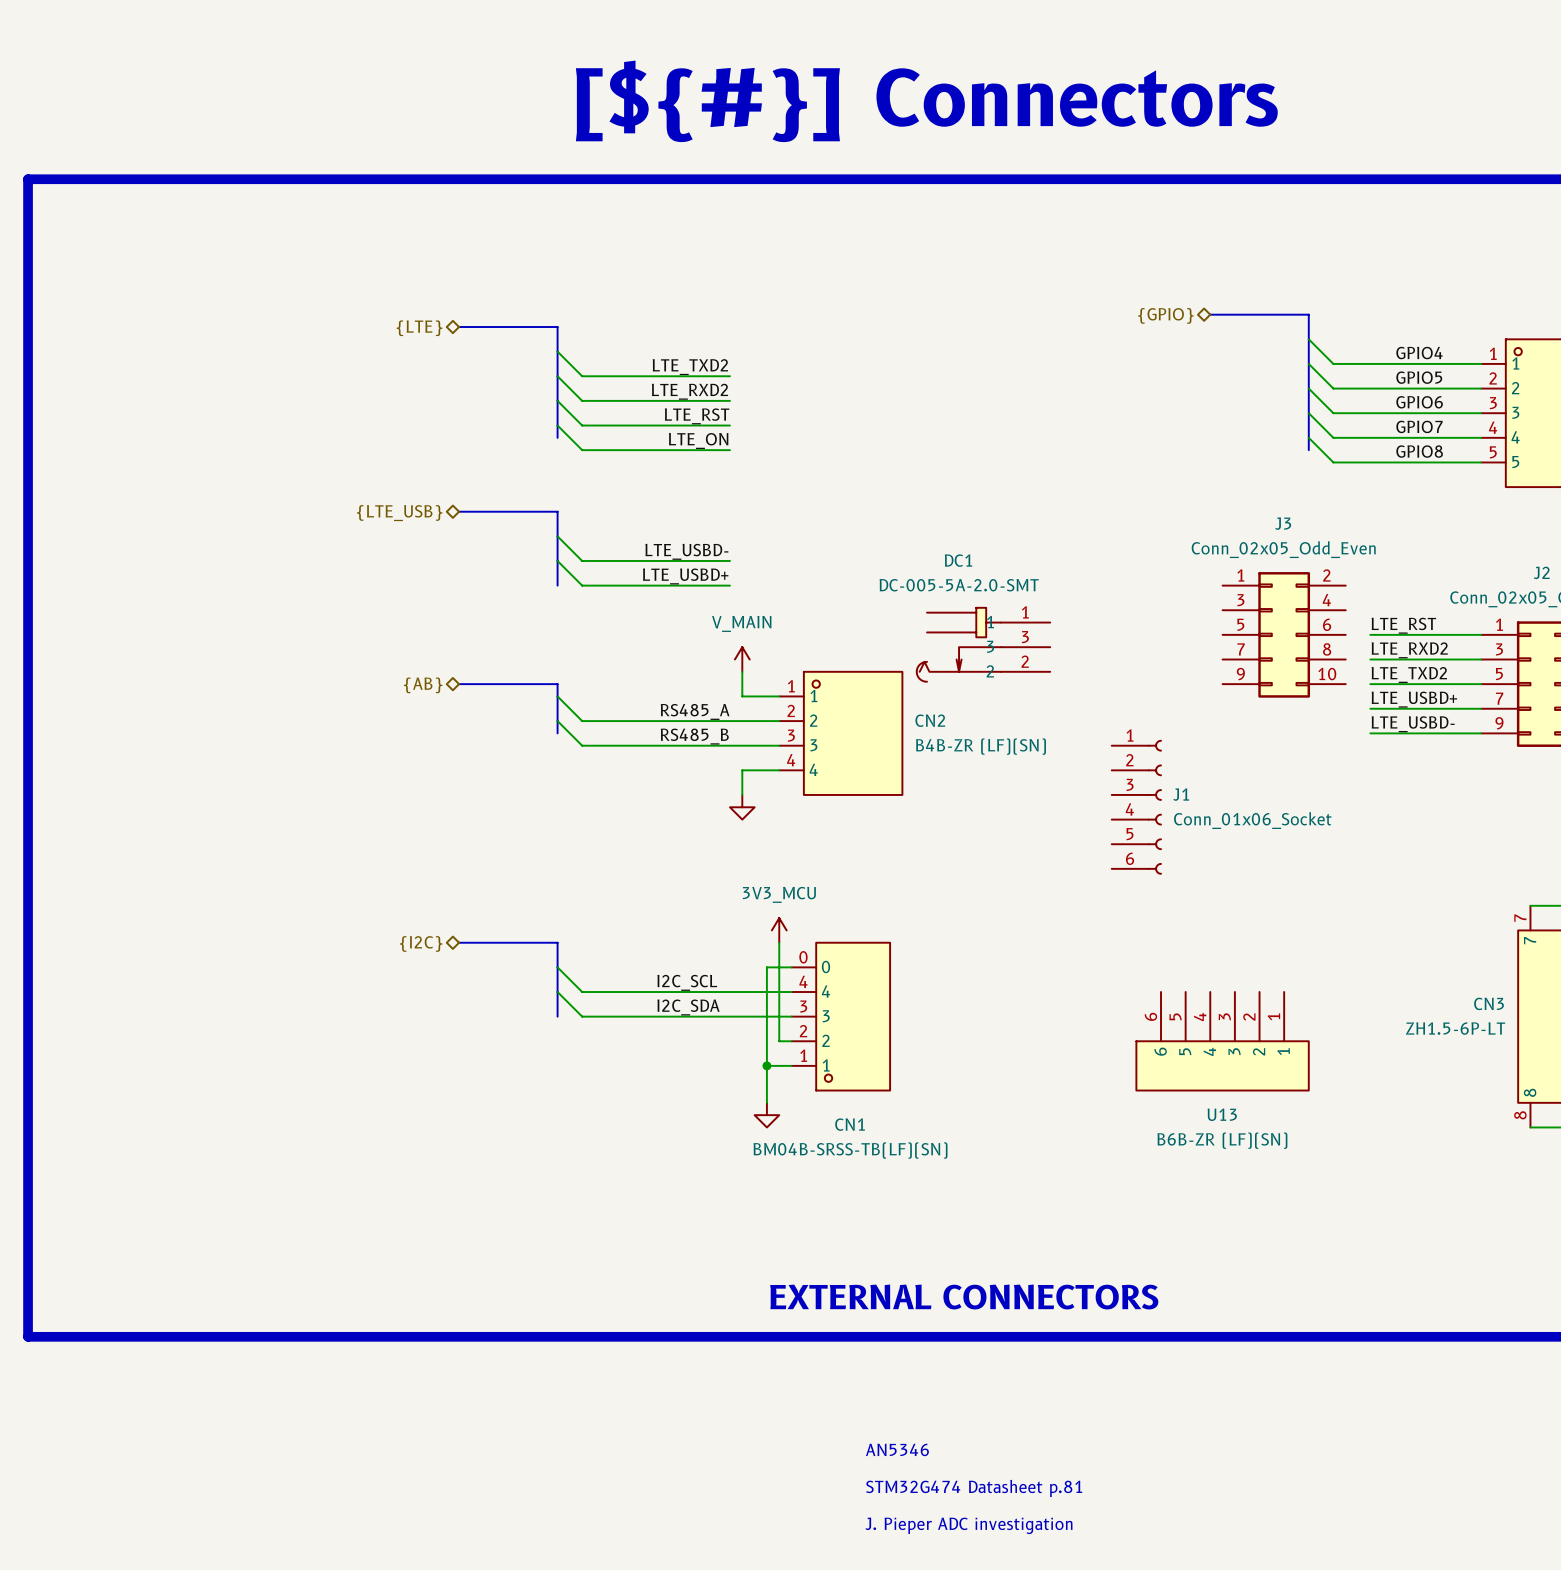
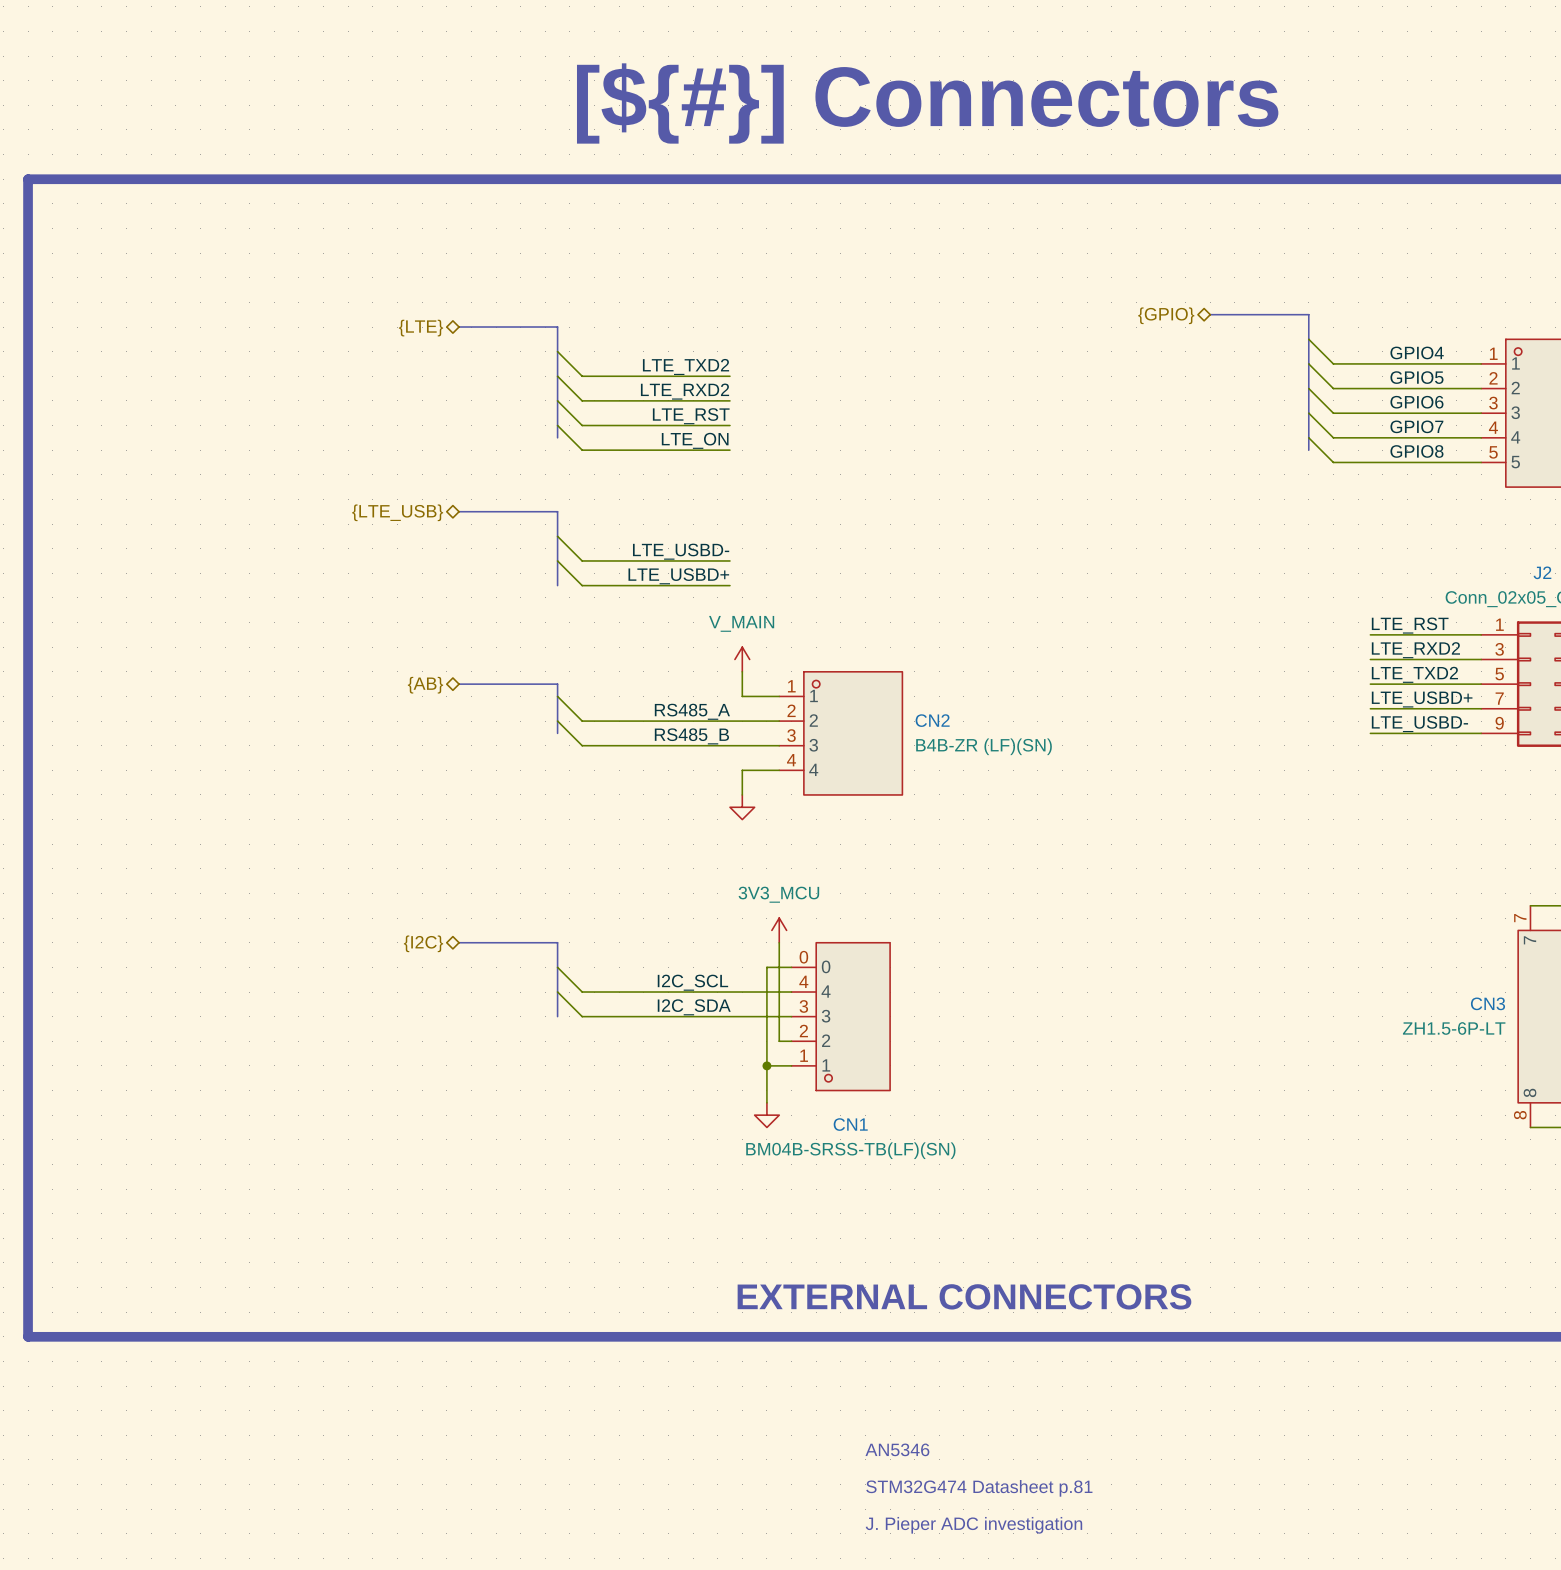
J3: Conn_02x05_Odd_Even (1284, 634) -> none
DC1: DC-005-5A-2.0-SMT (983, 644) -> none
J1: Conn_01x06_Socket (1136, 807) -> none
U13: B6B-ZR (LF)(SN) (1222, 1041) -> none

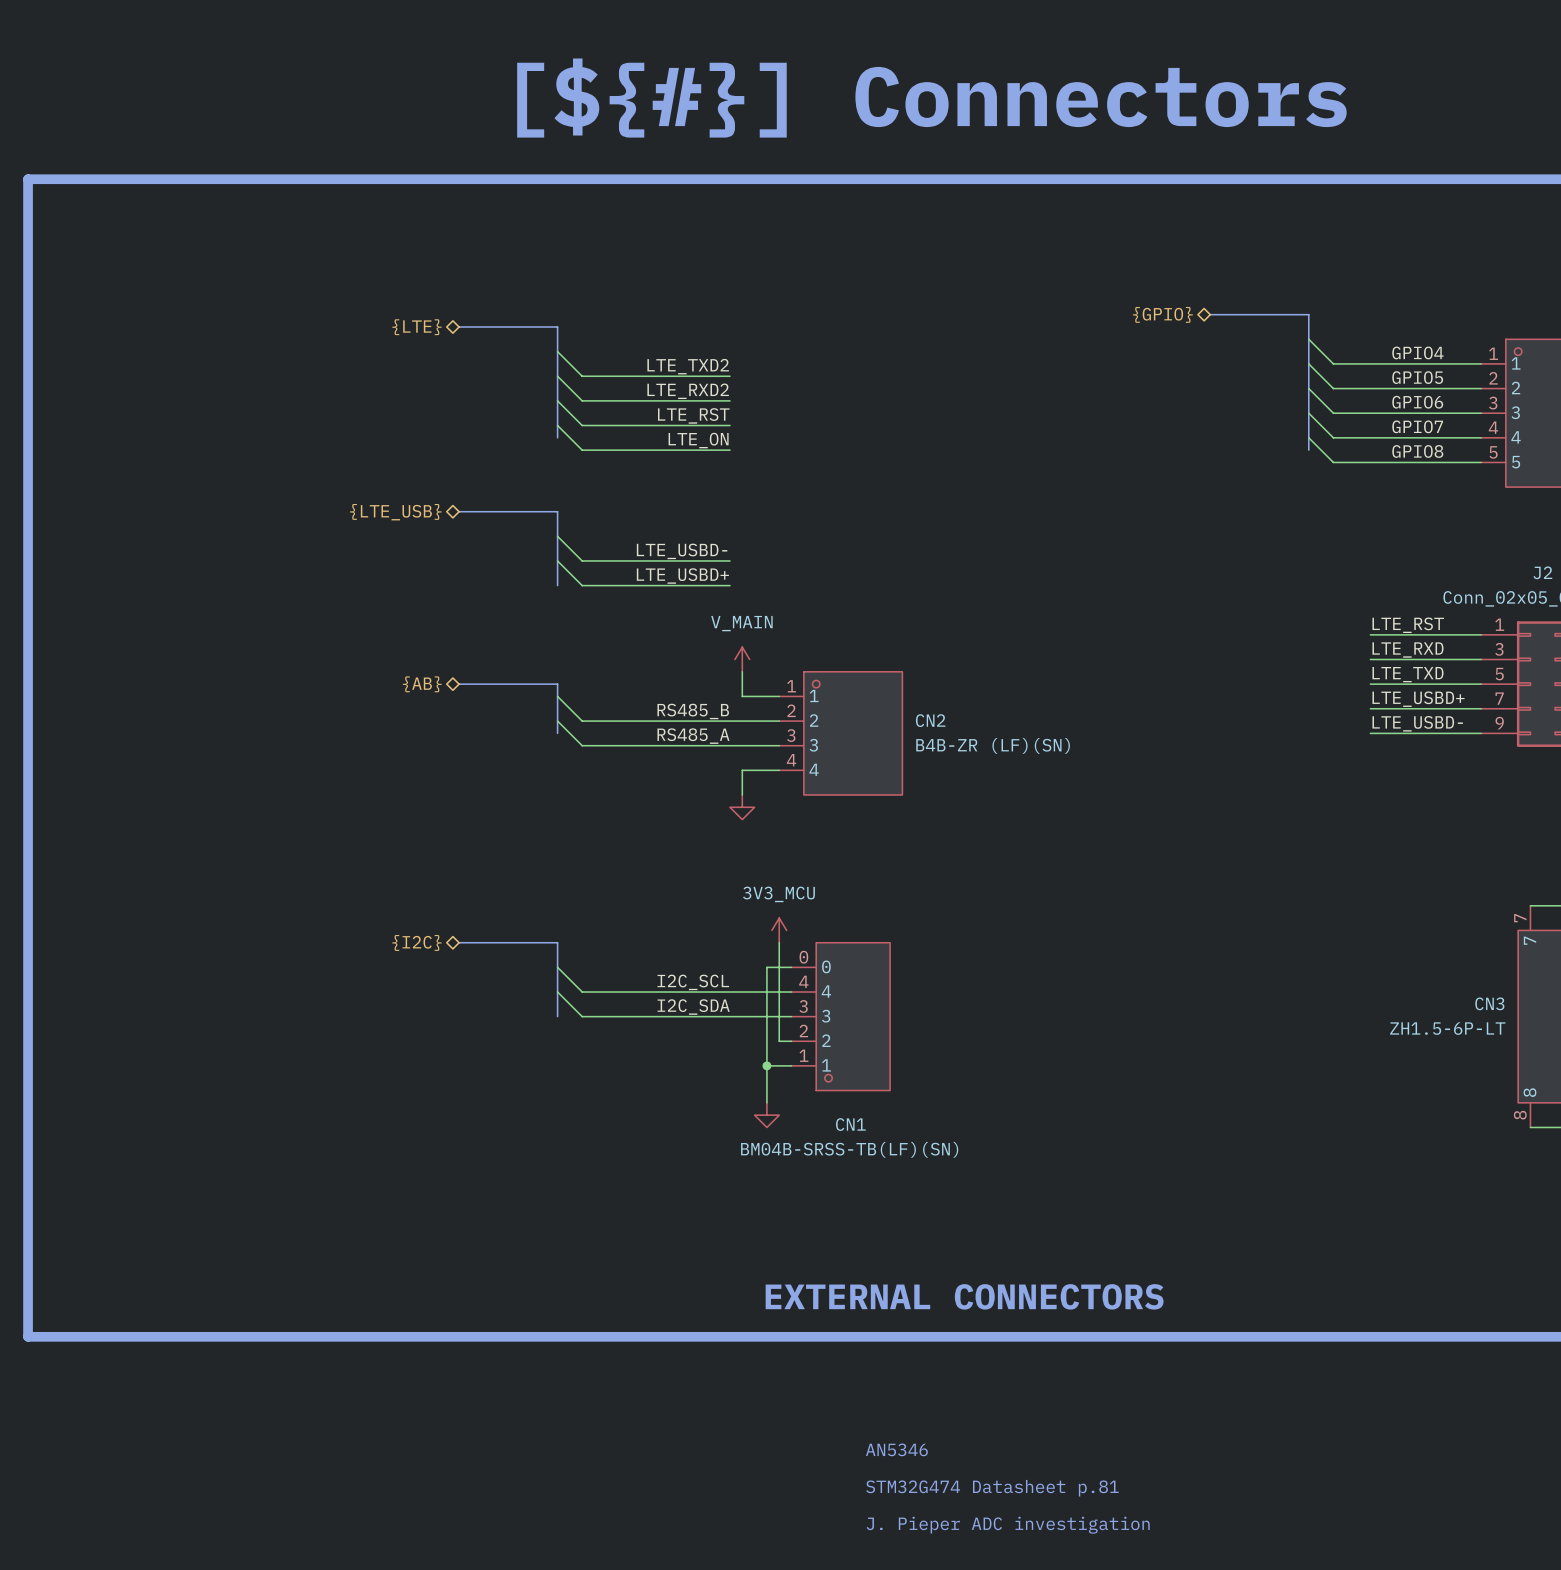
label: LTE_RXD2 (1415, 650) -> LTE_RXD (1407, 650)
label: LTE_TXD2 (1414, 674) -> LTE_TXD (1407, 674)
label: RS485_A (692, 711) -> RS485_B (693, 711)
label: RS485_B (691, 736) -> RS485_A (693, 736)

